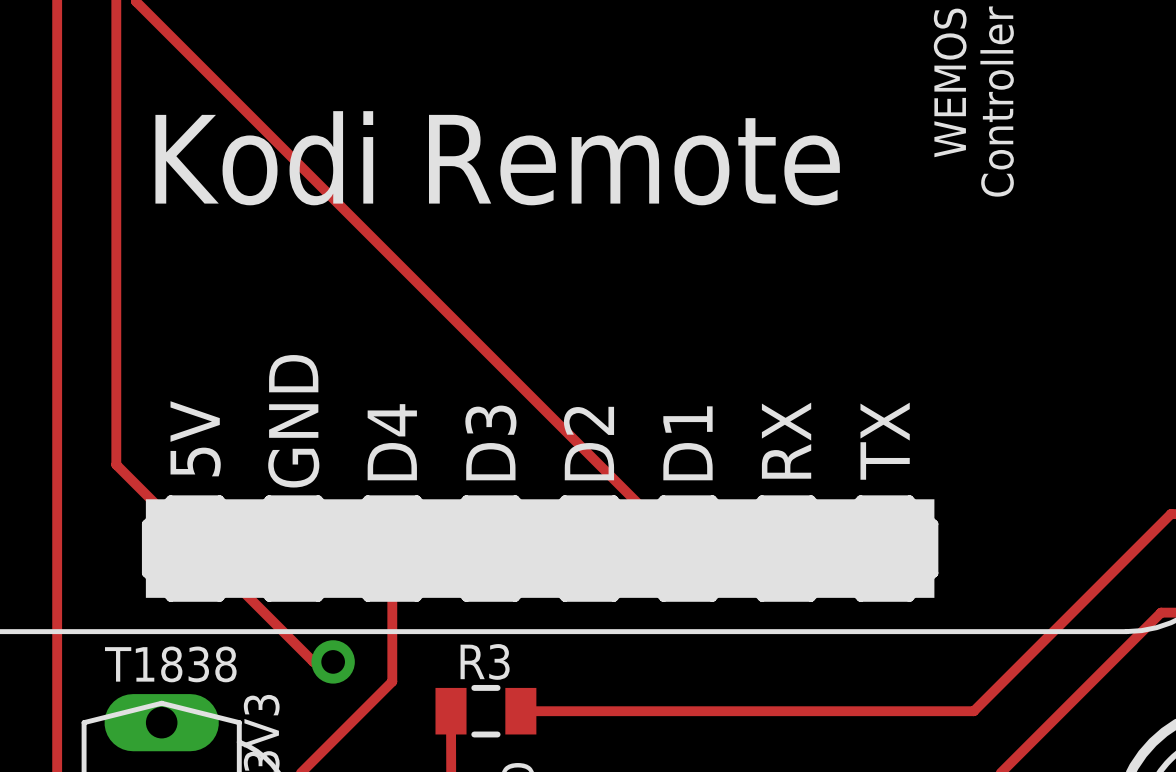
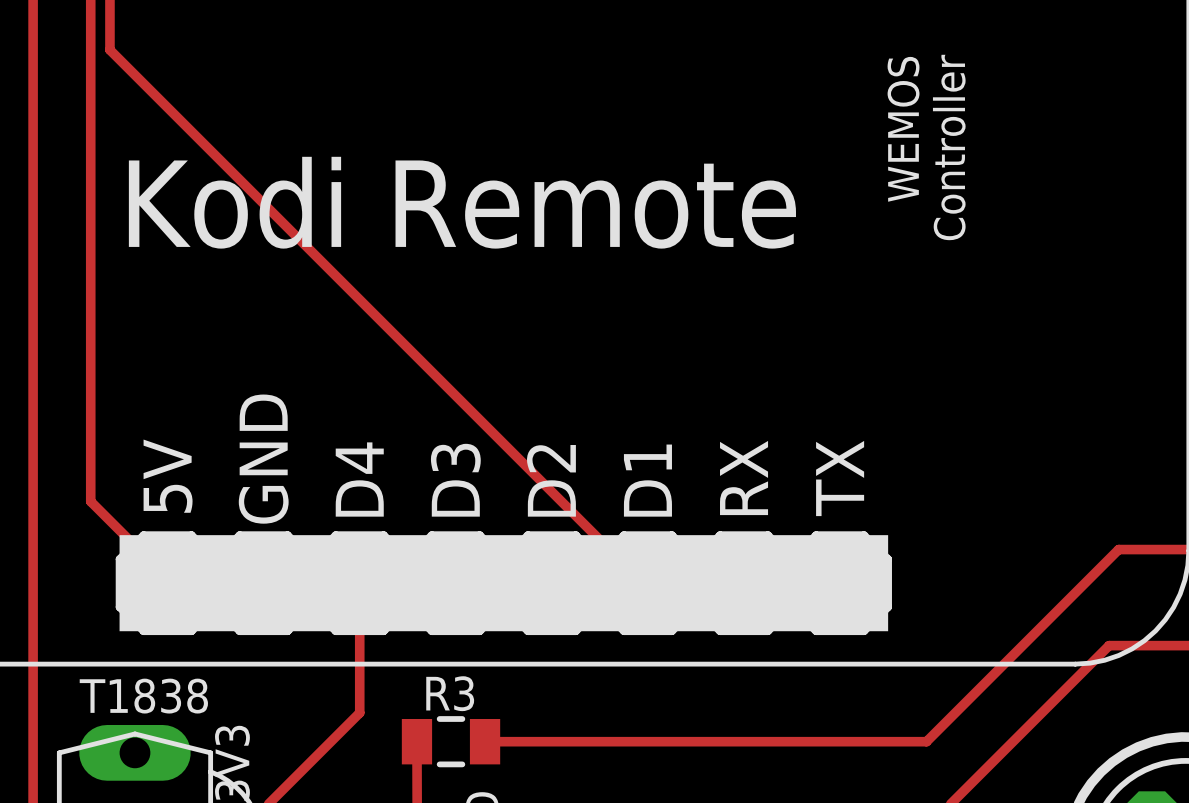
track: (195, 543) (313, 661) (333, 661) -> none
via: (333, 661) -> none

